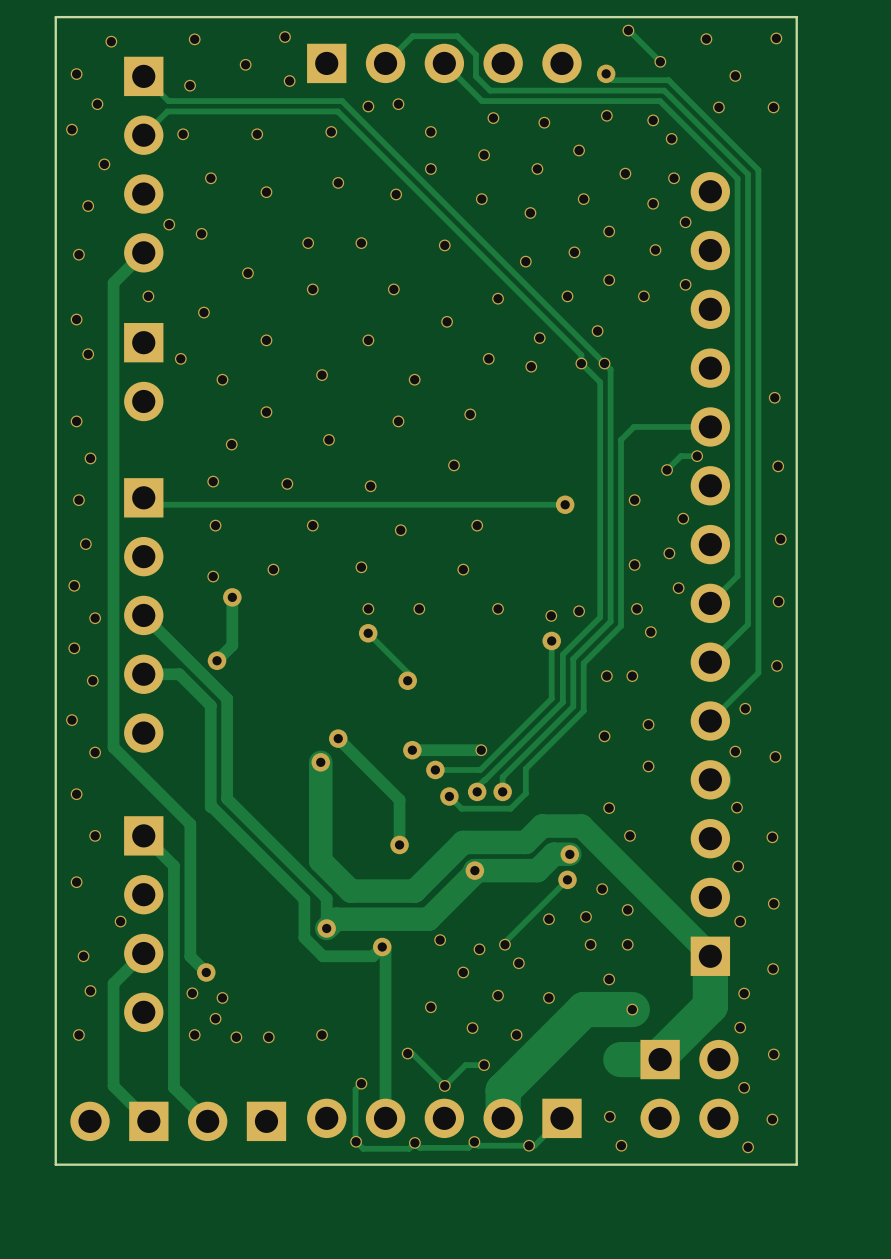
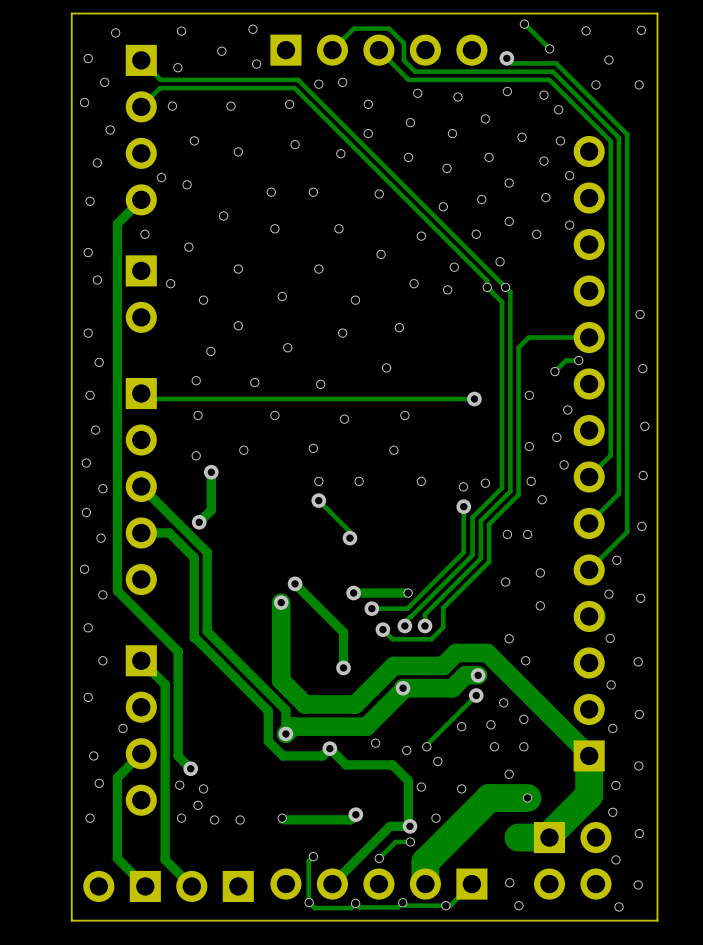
track: (385, 950) (385, 1118) -> (332, 751) (346, 764) (392, 764) (408, 780) (408, 824) (410, 826) (390, 826) (332, 884)
via: (463, 972) -> none
via: (430, 1007) -> none
via: (472, 1028) -> none
track: none -> (355, 814) (350, 819) (283, 819)
via: none -> (355, 814)
via: none -> (410, 826)
track: (407, 1053) (412, 1053) (444, 1085) -> none
via: (407, 1053) -> none

